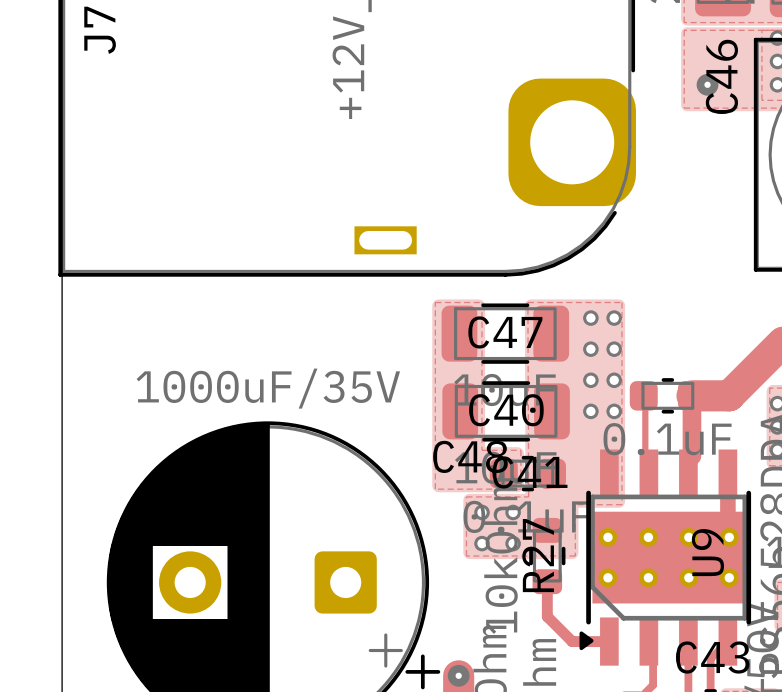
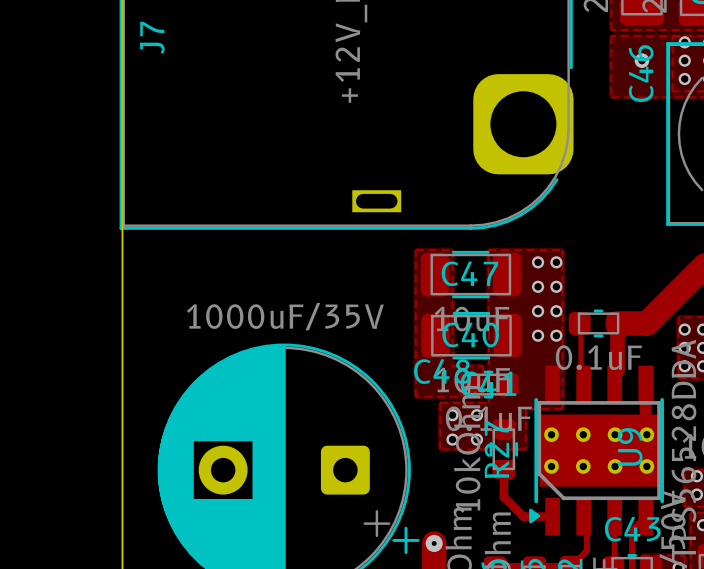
via: none -> (641, 60)
via: (707, 84) -> none

